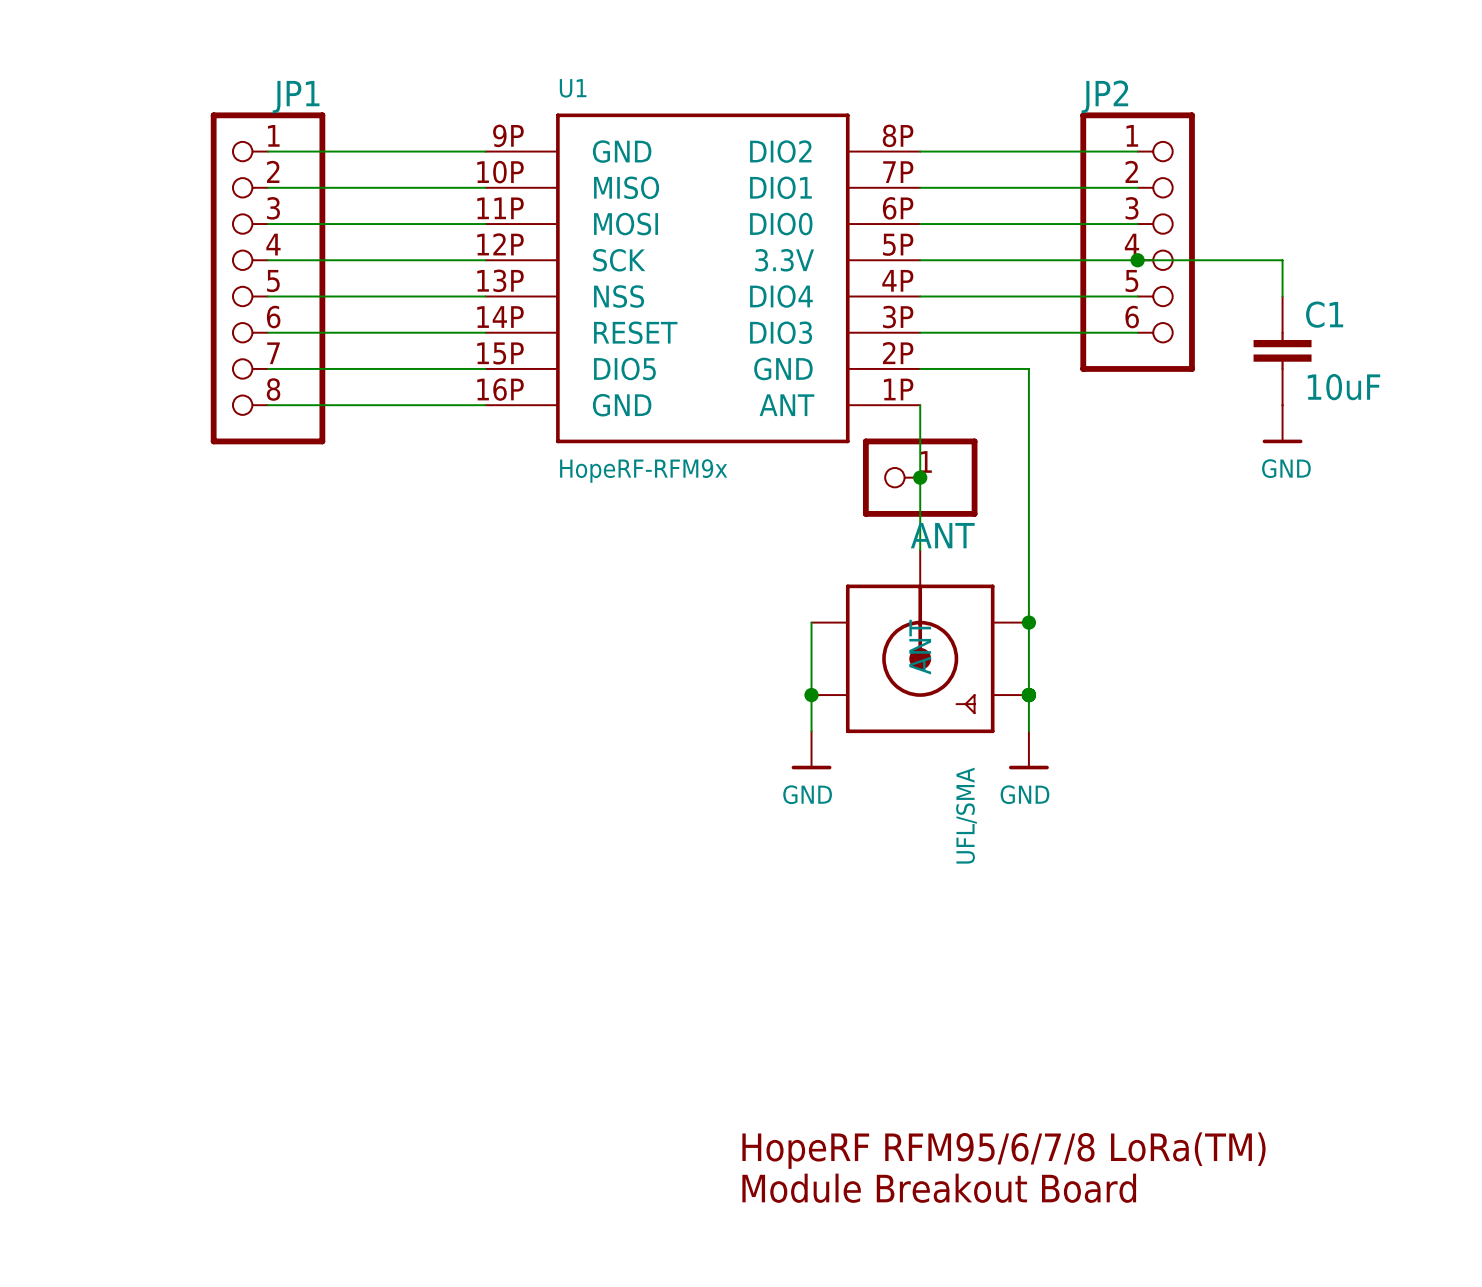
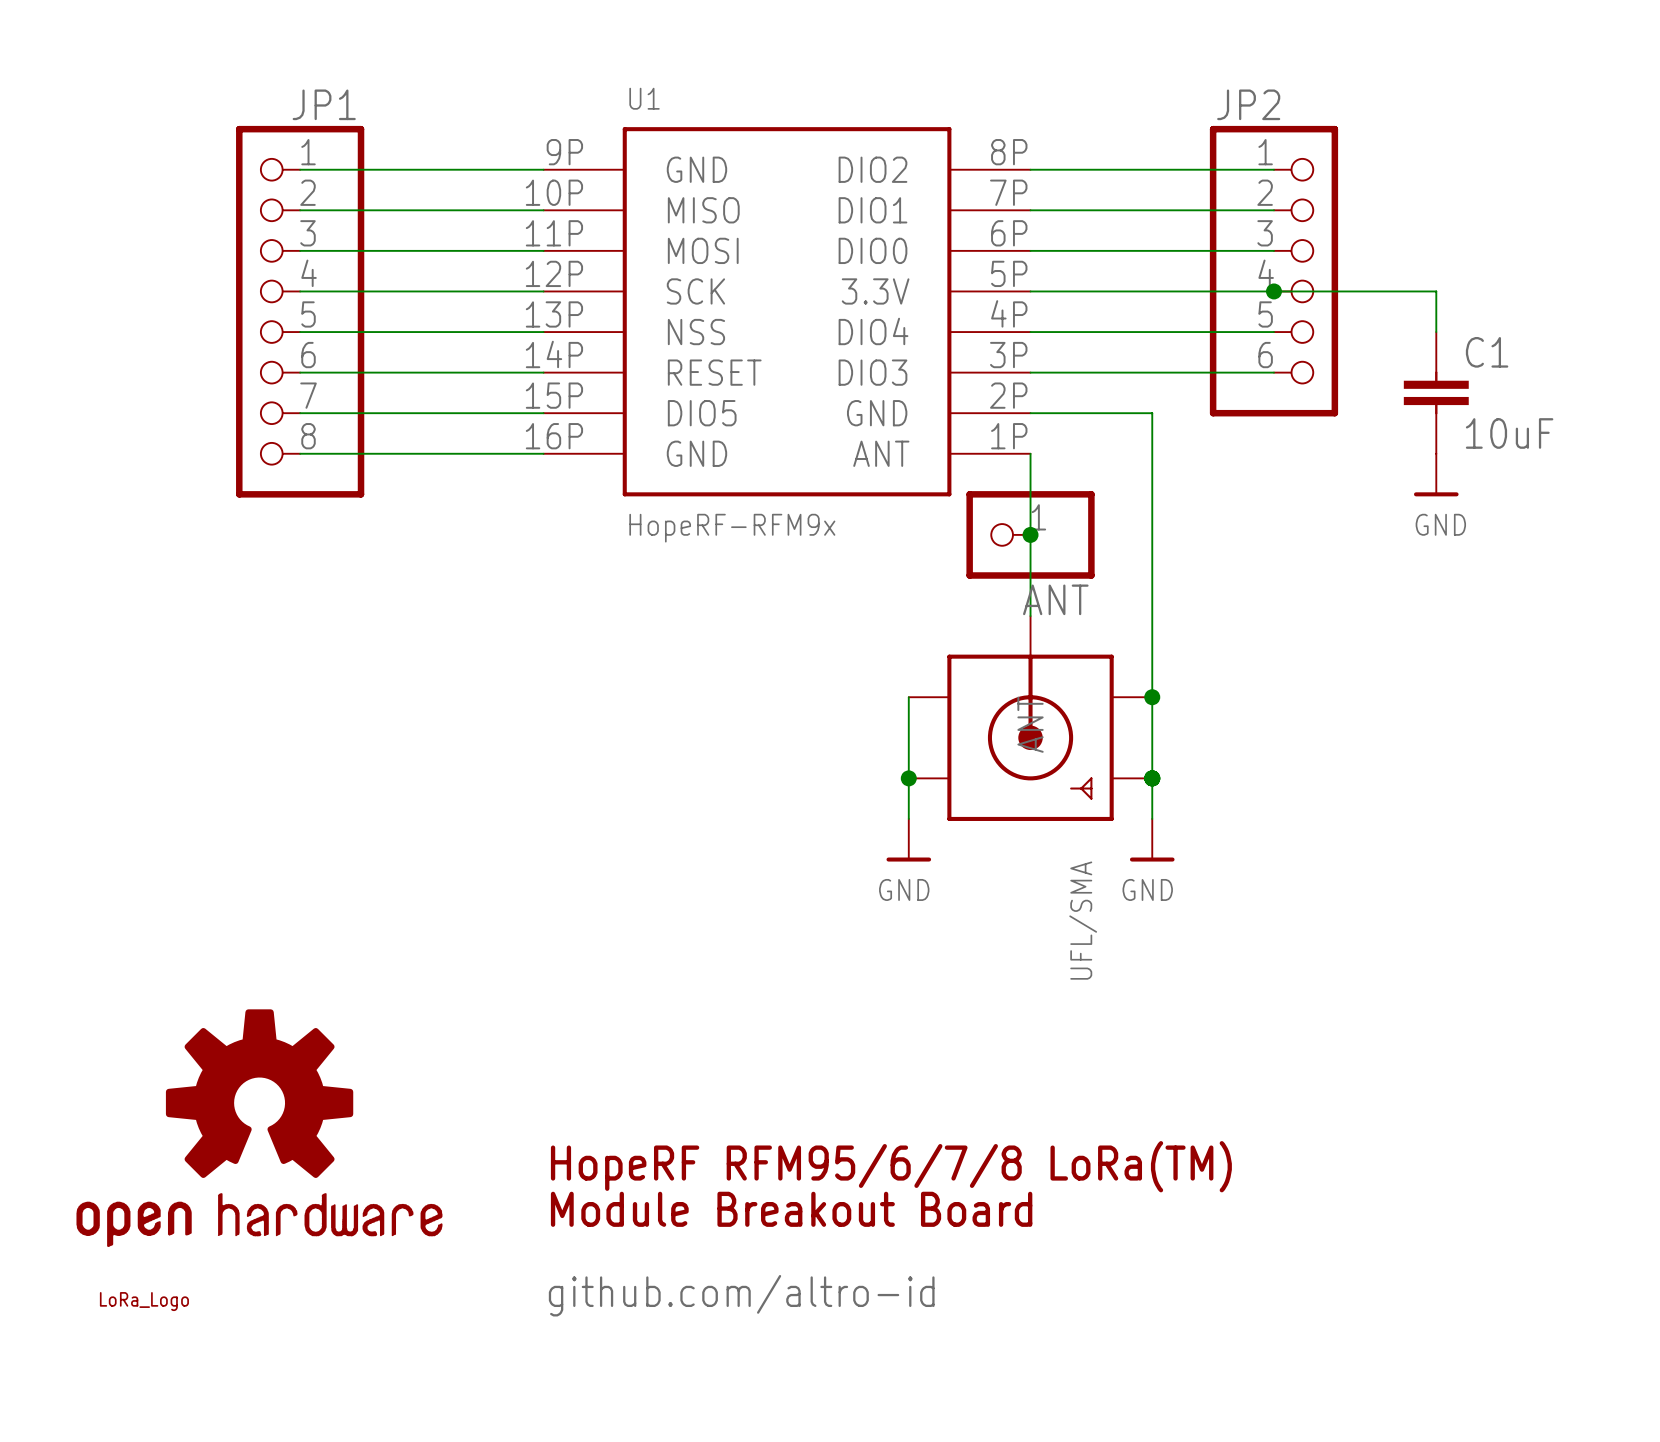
part: none -> (259, 1128)
text position: HopeRF RFM95/6/7/8 LoRa(TM) (1003, 1150) -> HopeRF RFM95/6/7/8 LoRa(TM) (891, 1166)
text: none -> github.com/altro-id (741, 1295)
part: none -> (144, 1301)
text position: Module Breakout Board (939, 1188) -> Module Breakout Board (791, 1209)

